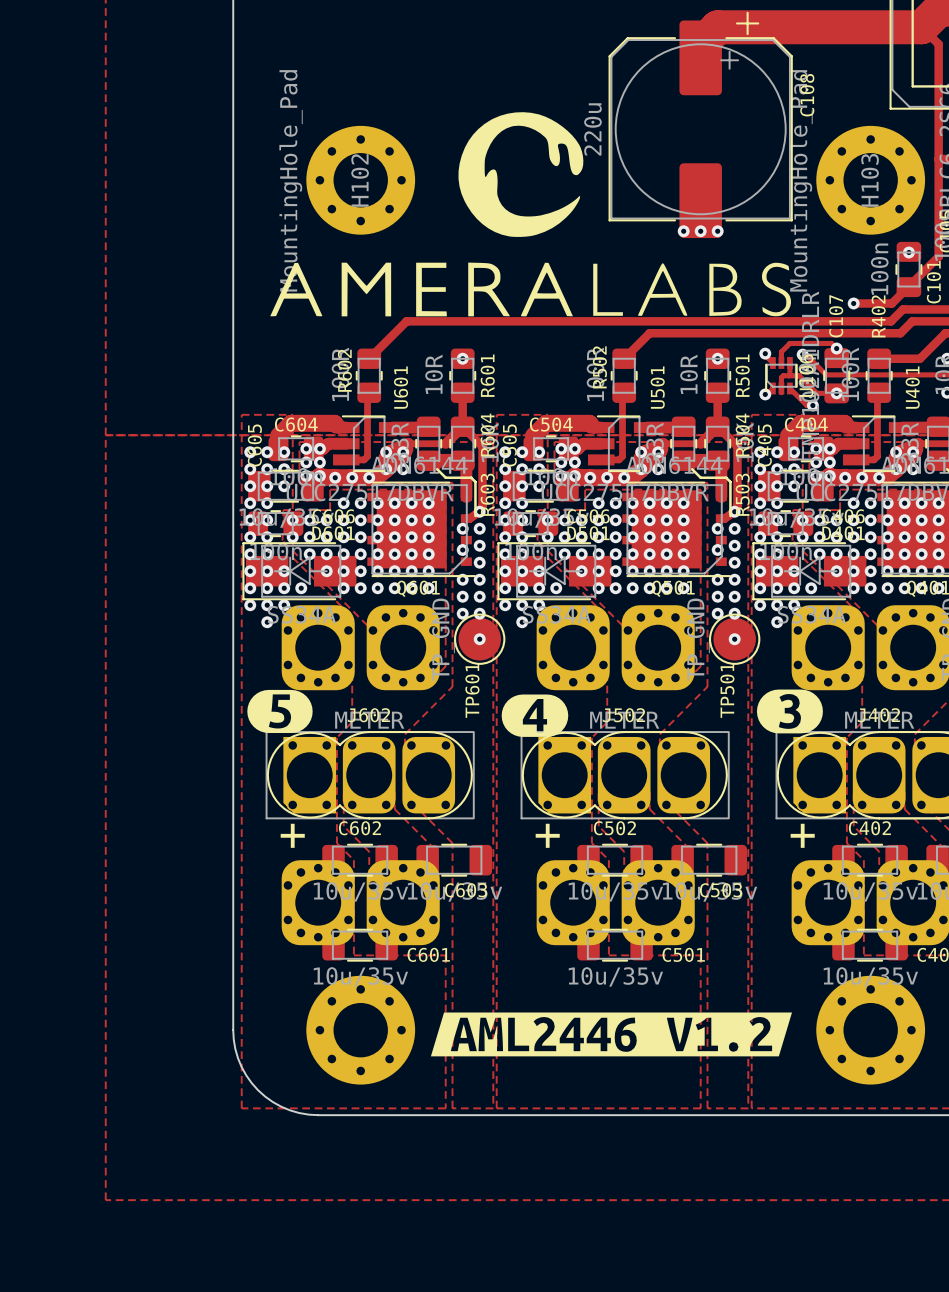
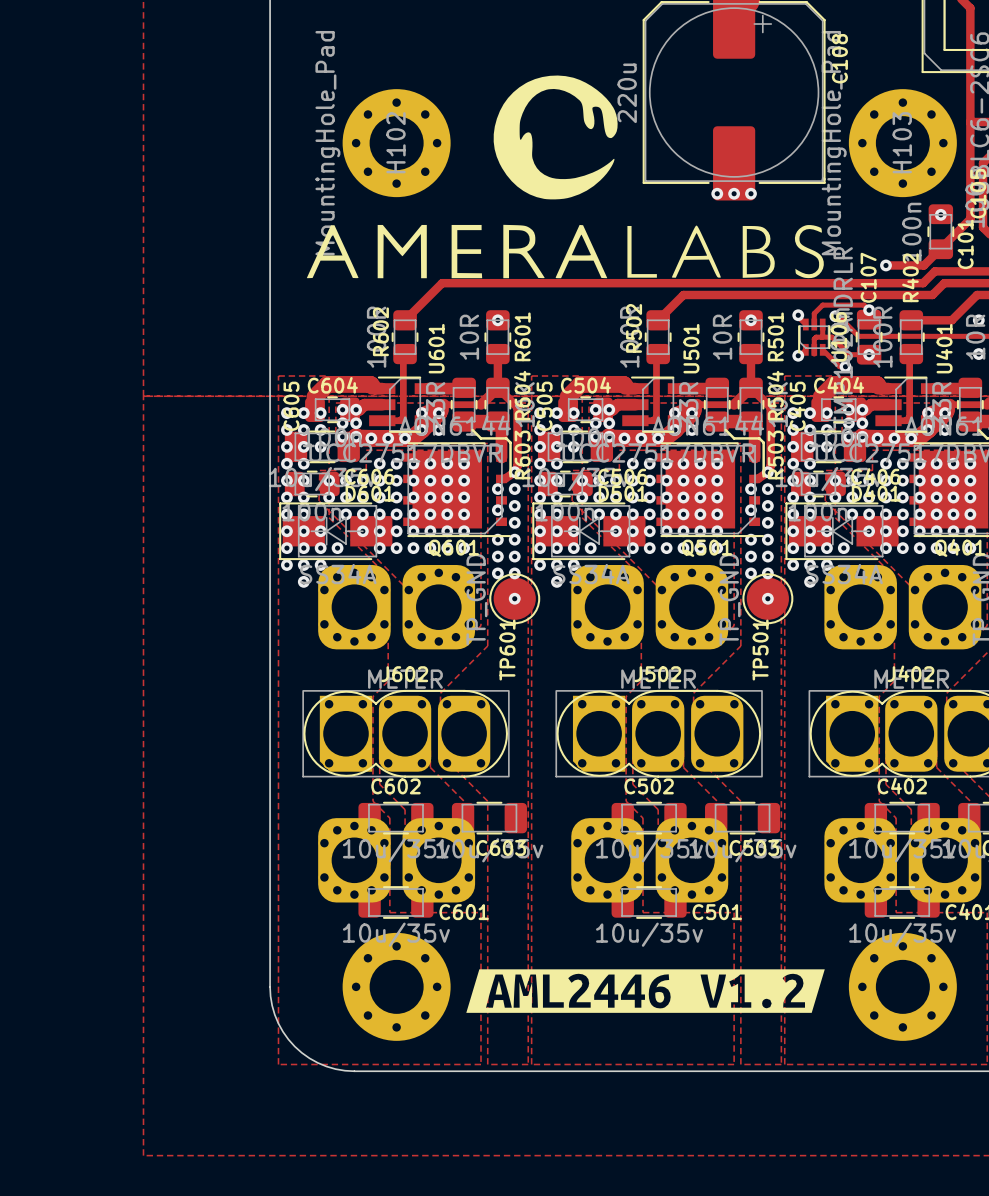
drawing: [247, 689, 313, 734] -> none
drawing: [756, 689, 823, 734] -> none
drawing: [501, 694, 569, 737] -> none
text: + (292, 835) -> none
text: + (547, 835) -> none
text: + (802, 835) -> none

